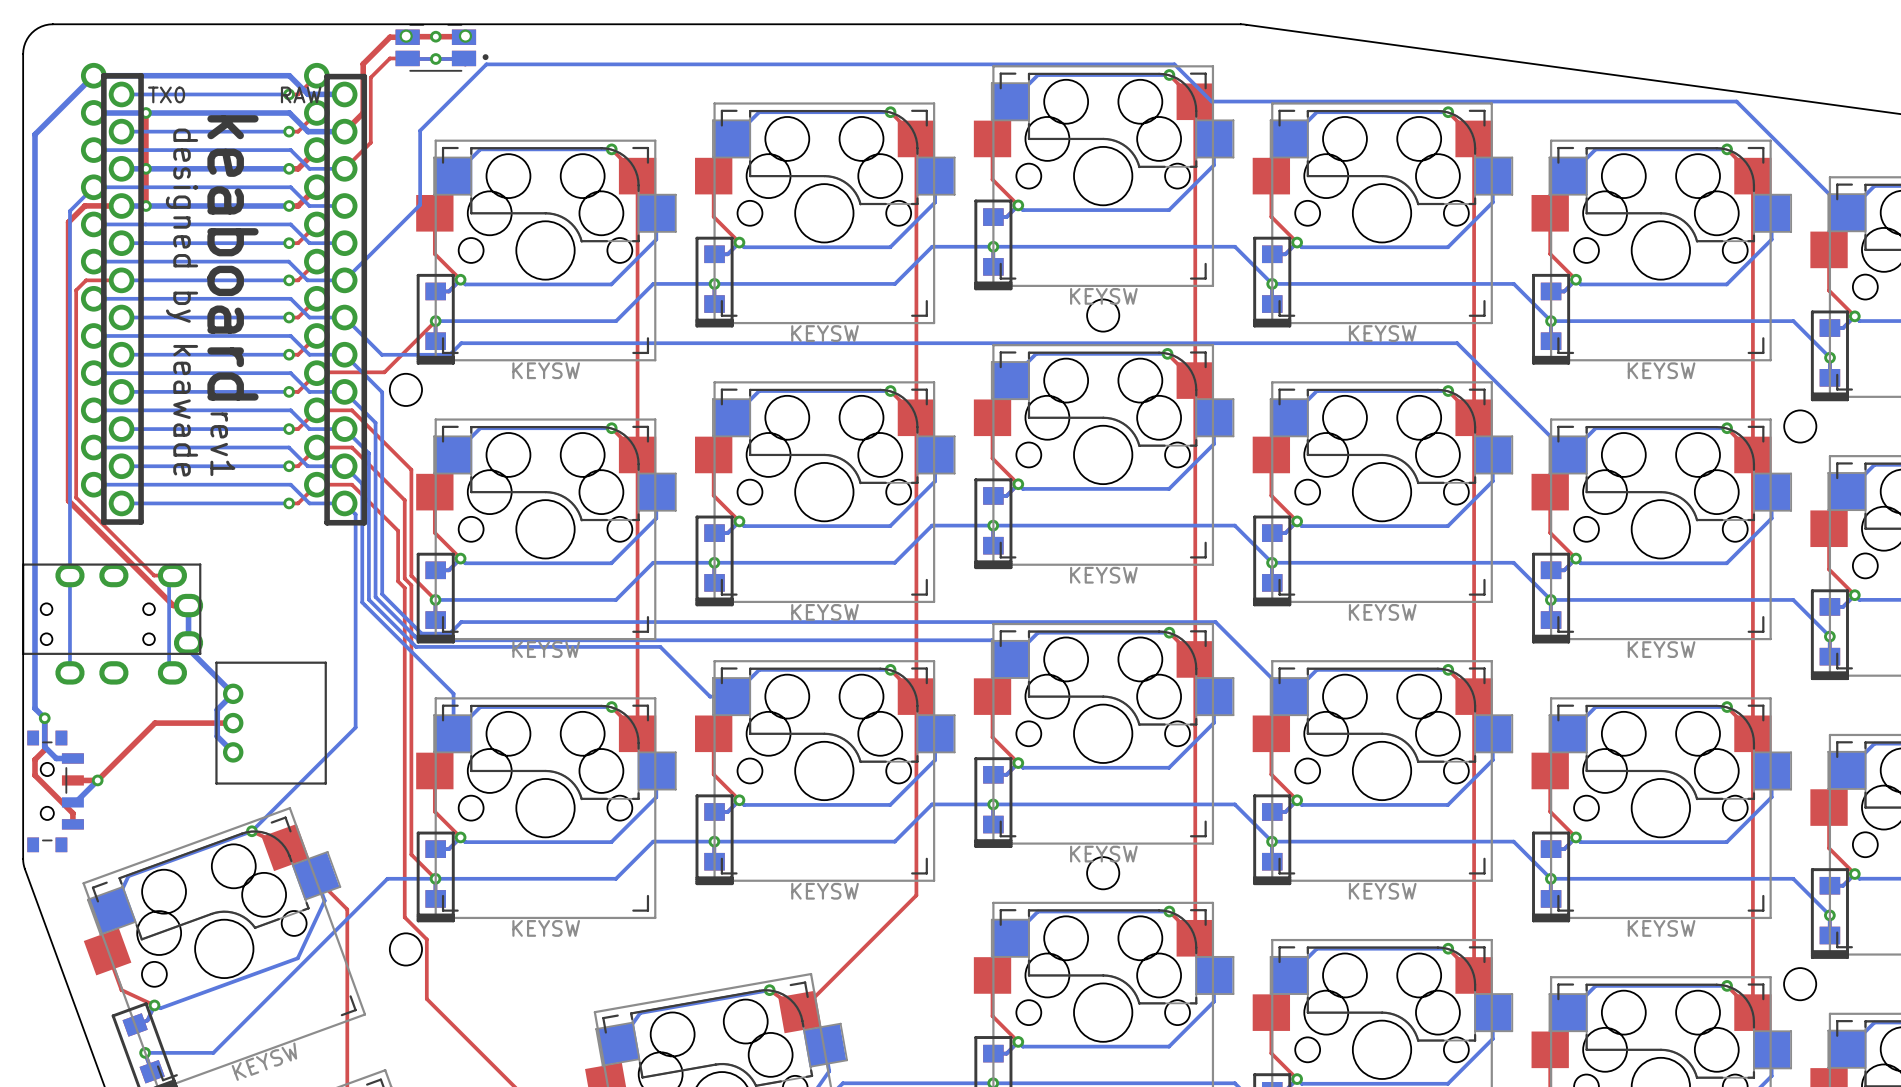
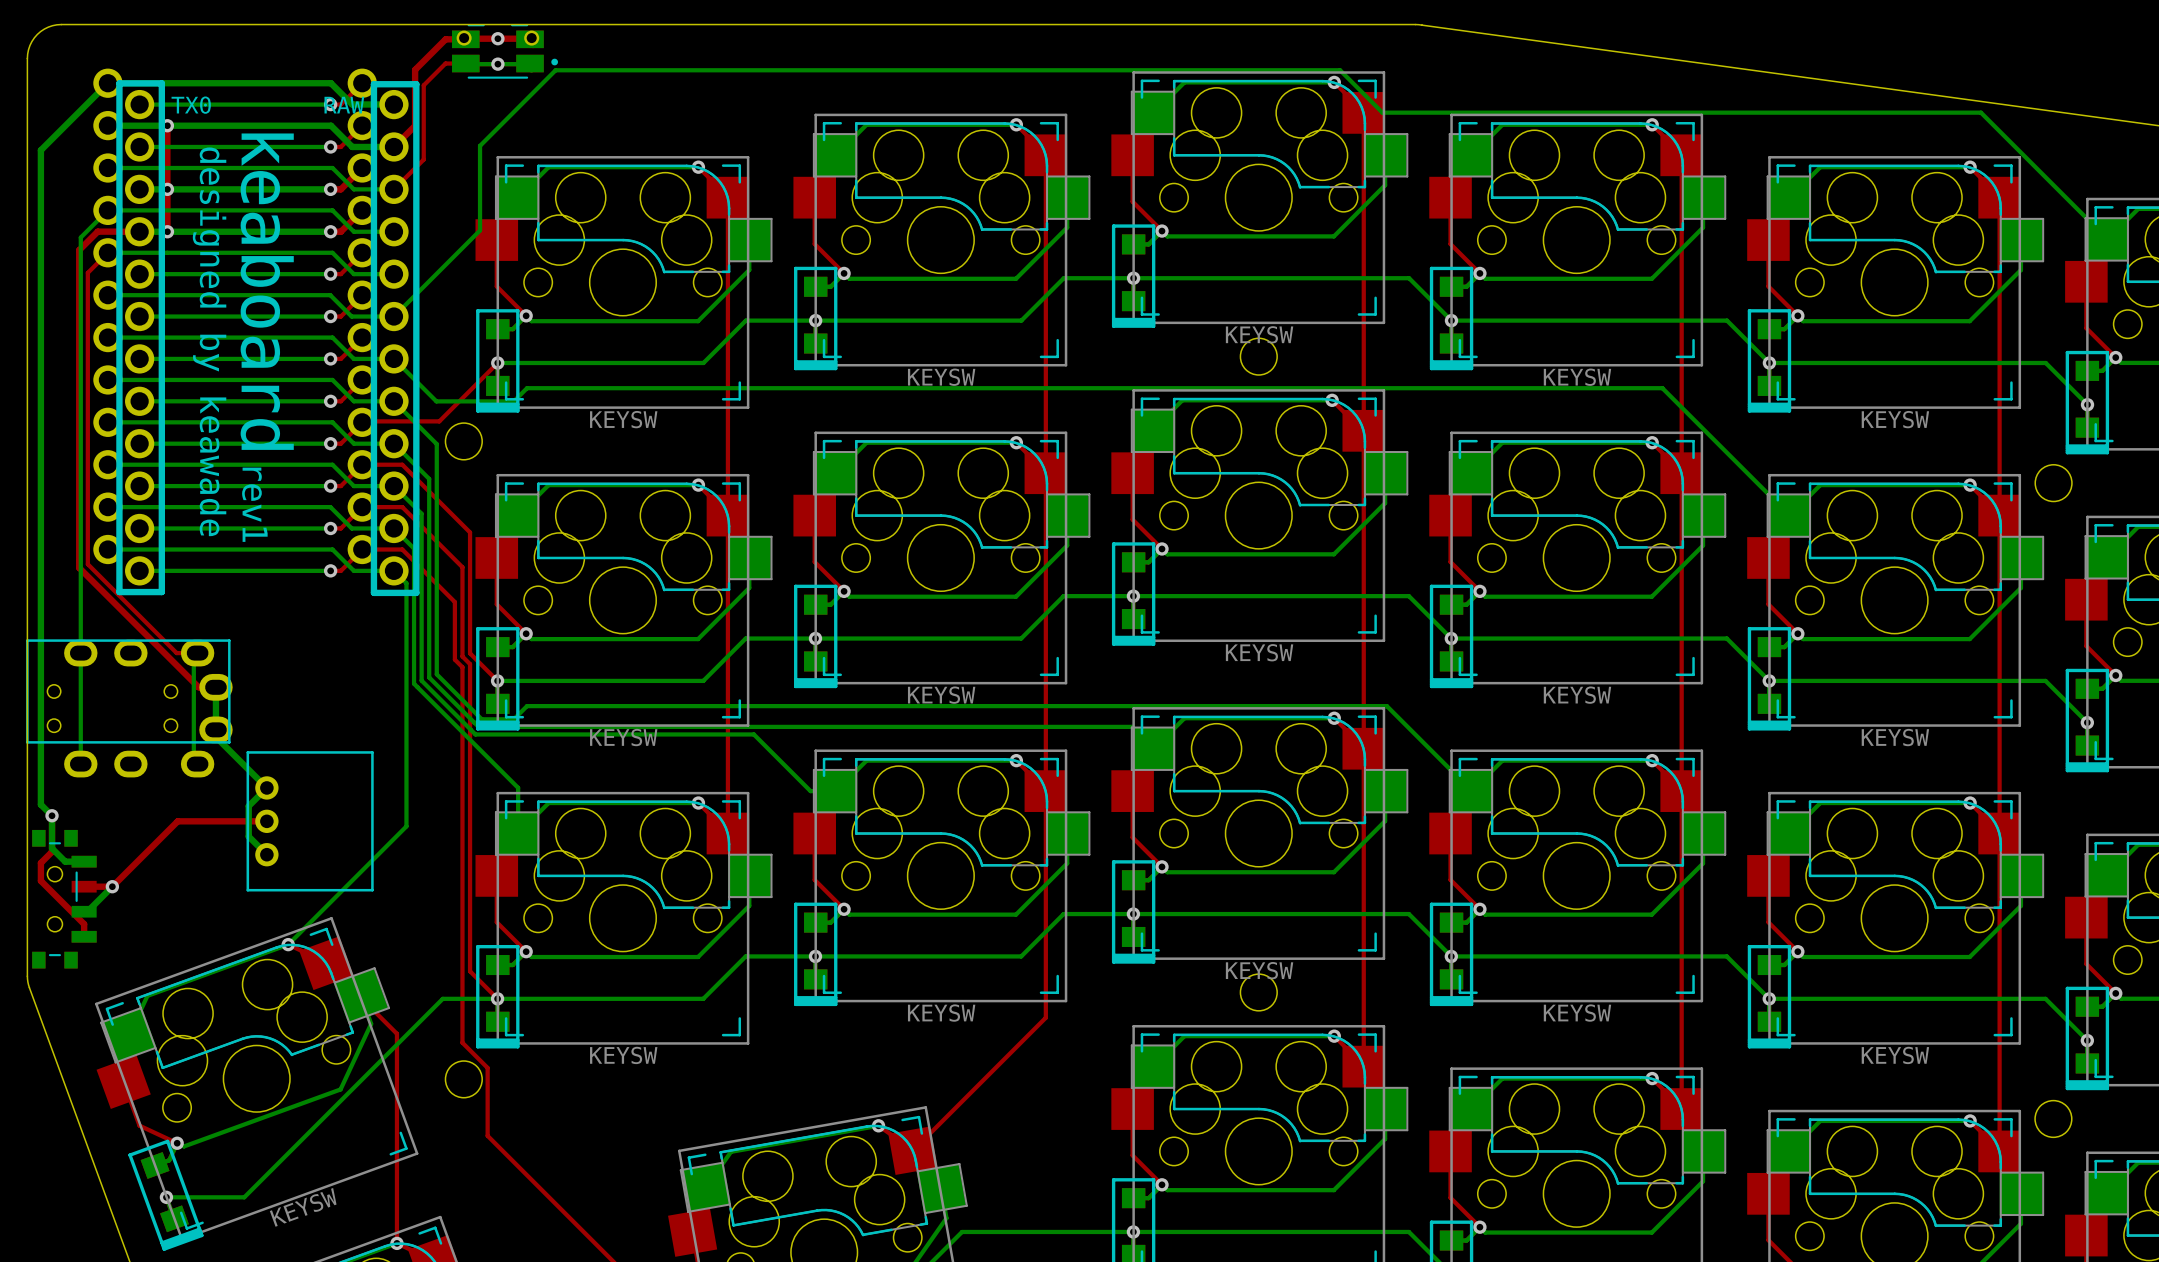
top track: (121, 280) (86, 280) (76, 290) -> (107, 252) (87, 272) (87, 327)

